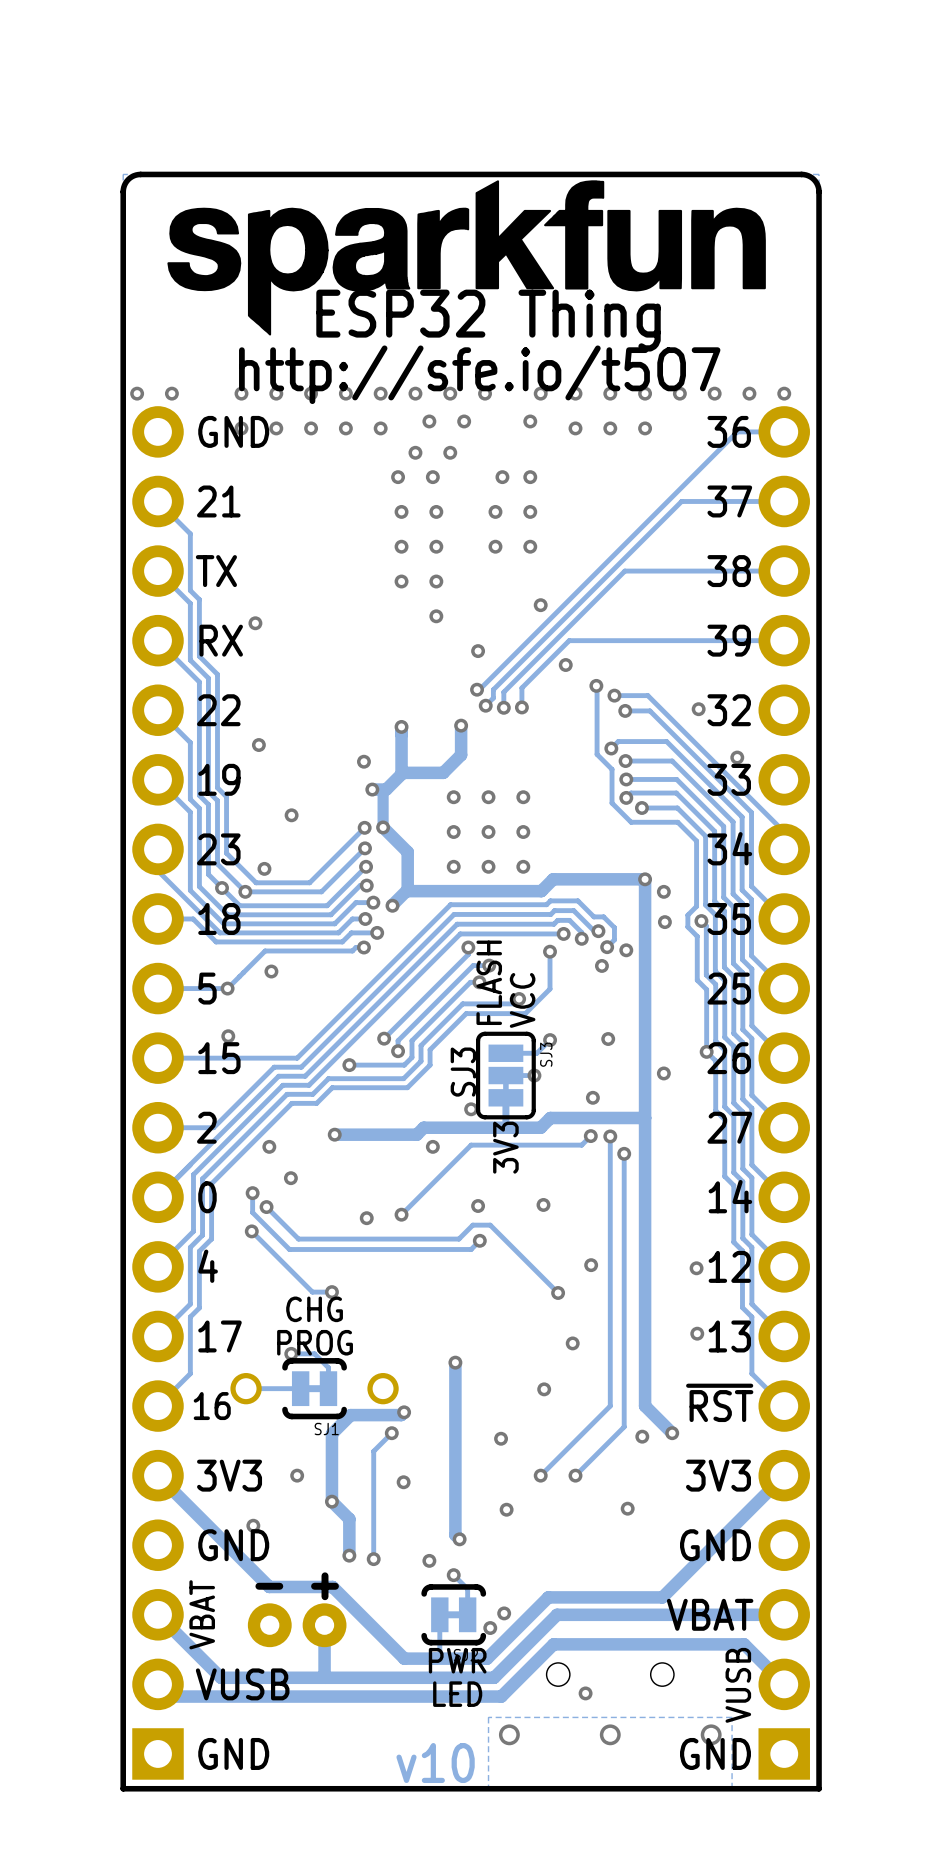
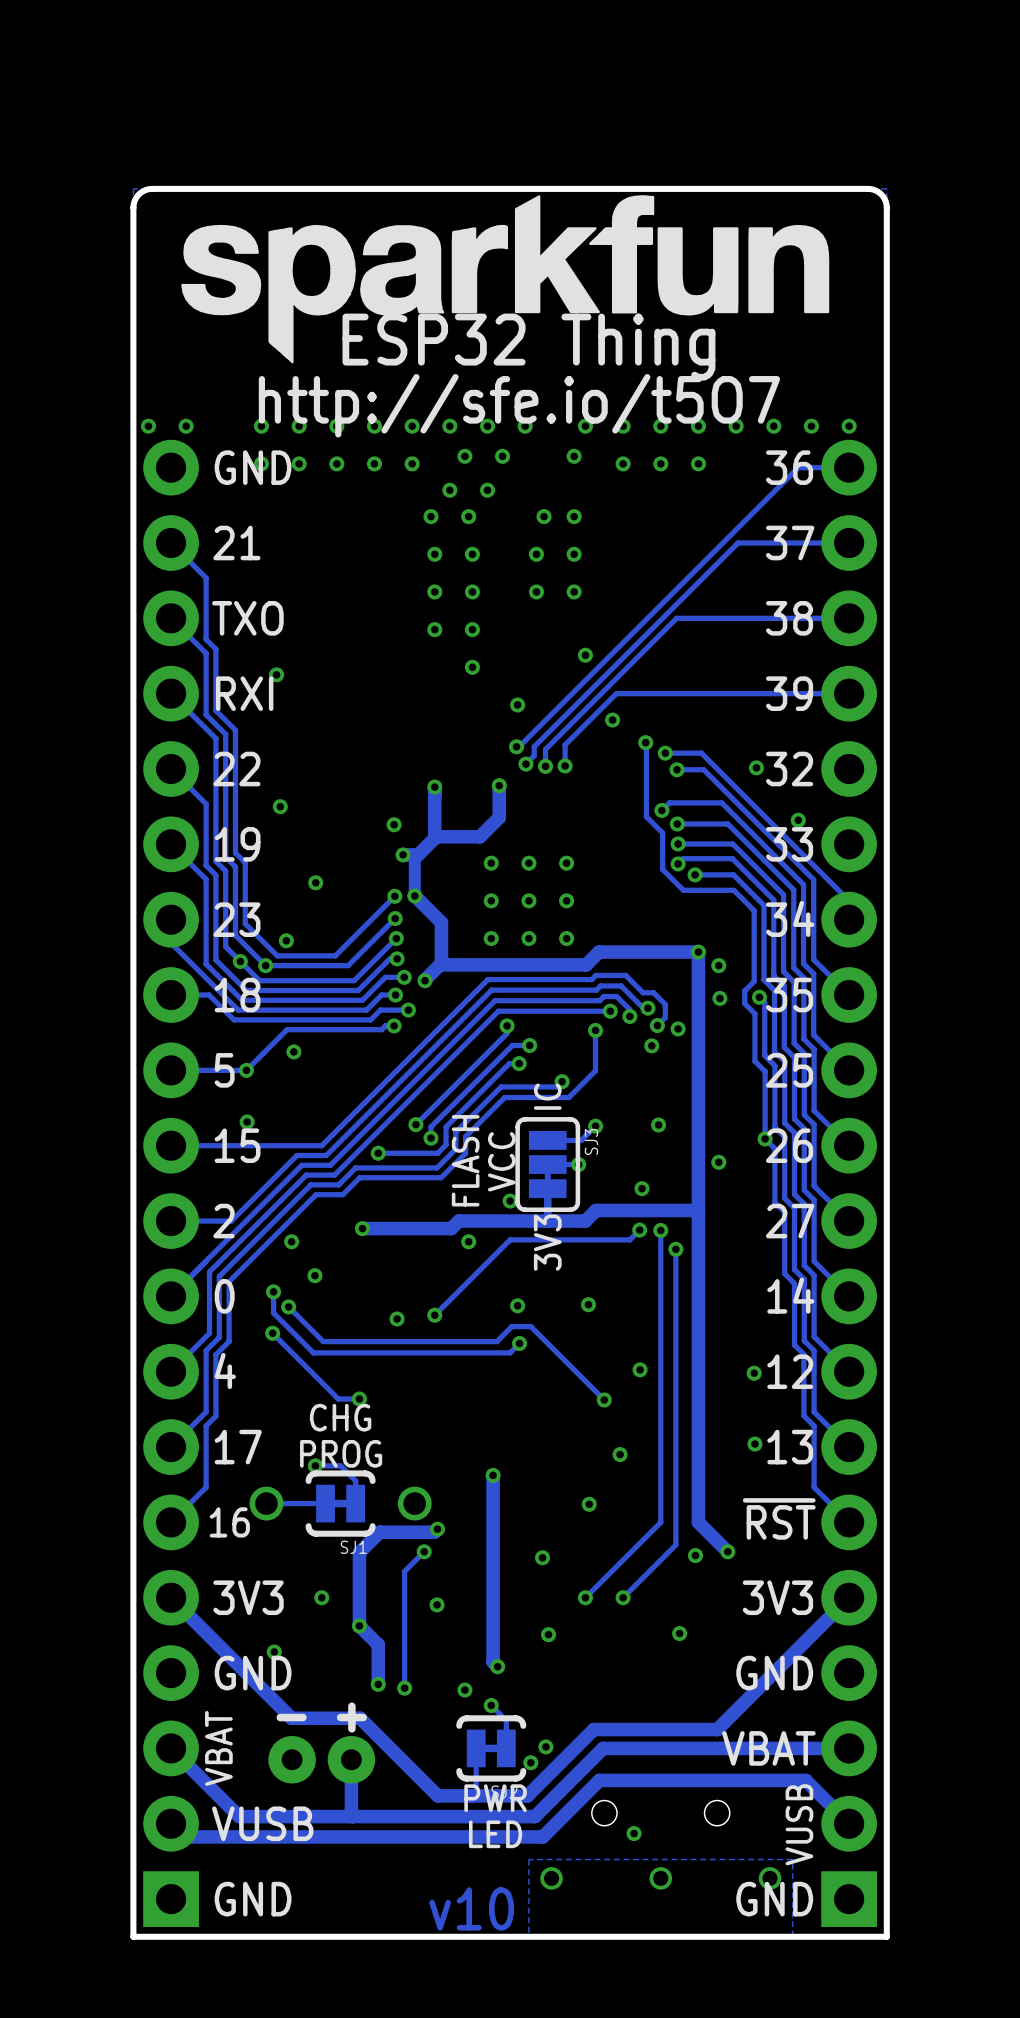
text: TX (216, 571) -> TXO (247, 618)
text: RX (221, 640) -> RXI (244, 693)
text position: FLASH (489, 982) -> FLASH (465, 1160)
text: VCC (522, 1000) -> none
text: none -> IC (547, 1096)
text: SJ3 (463, 1072) -> VCC (501, 1161)

